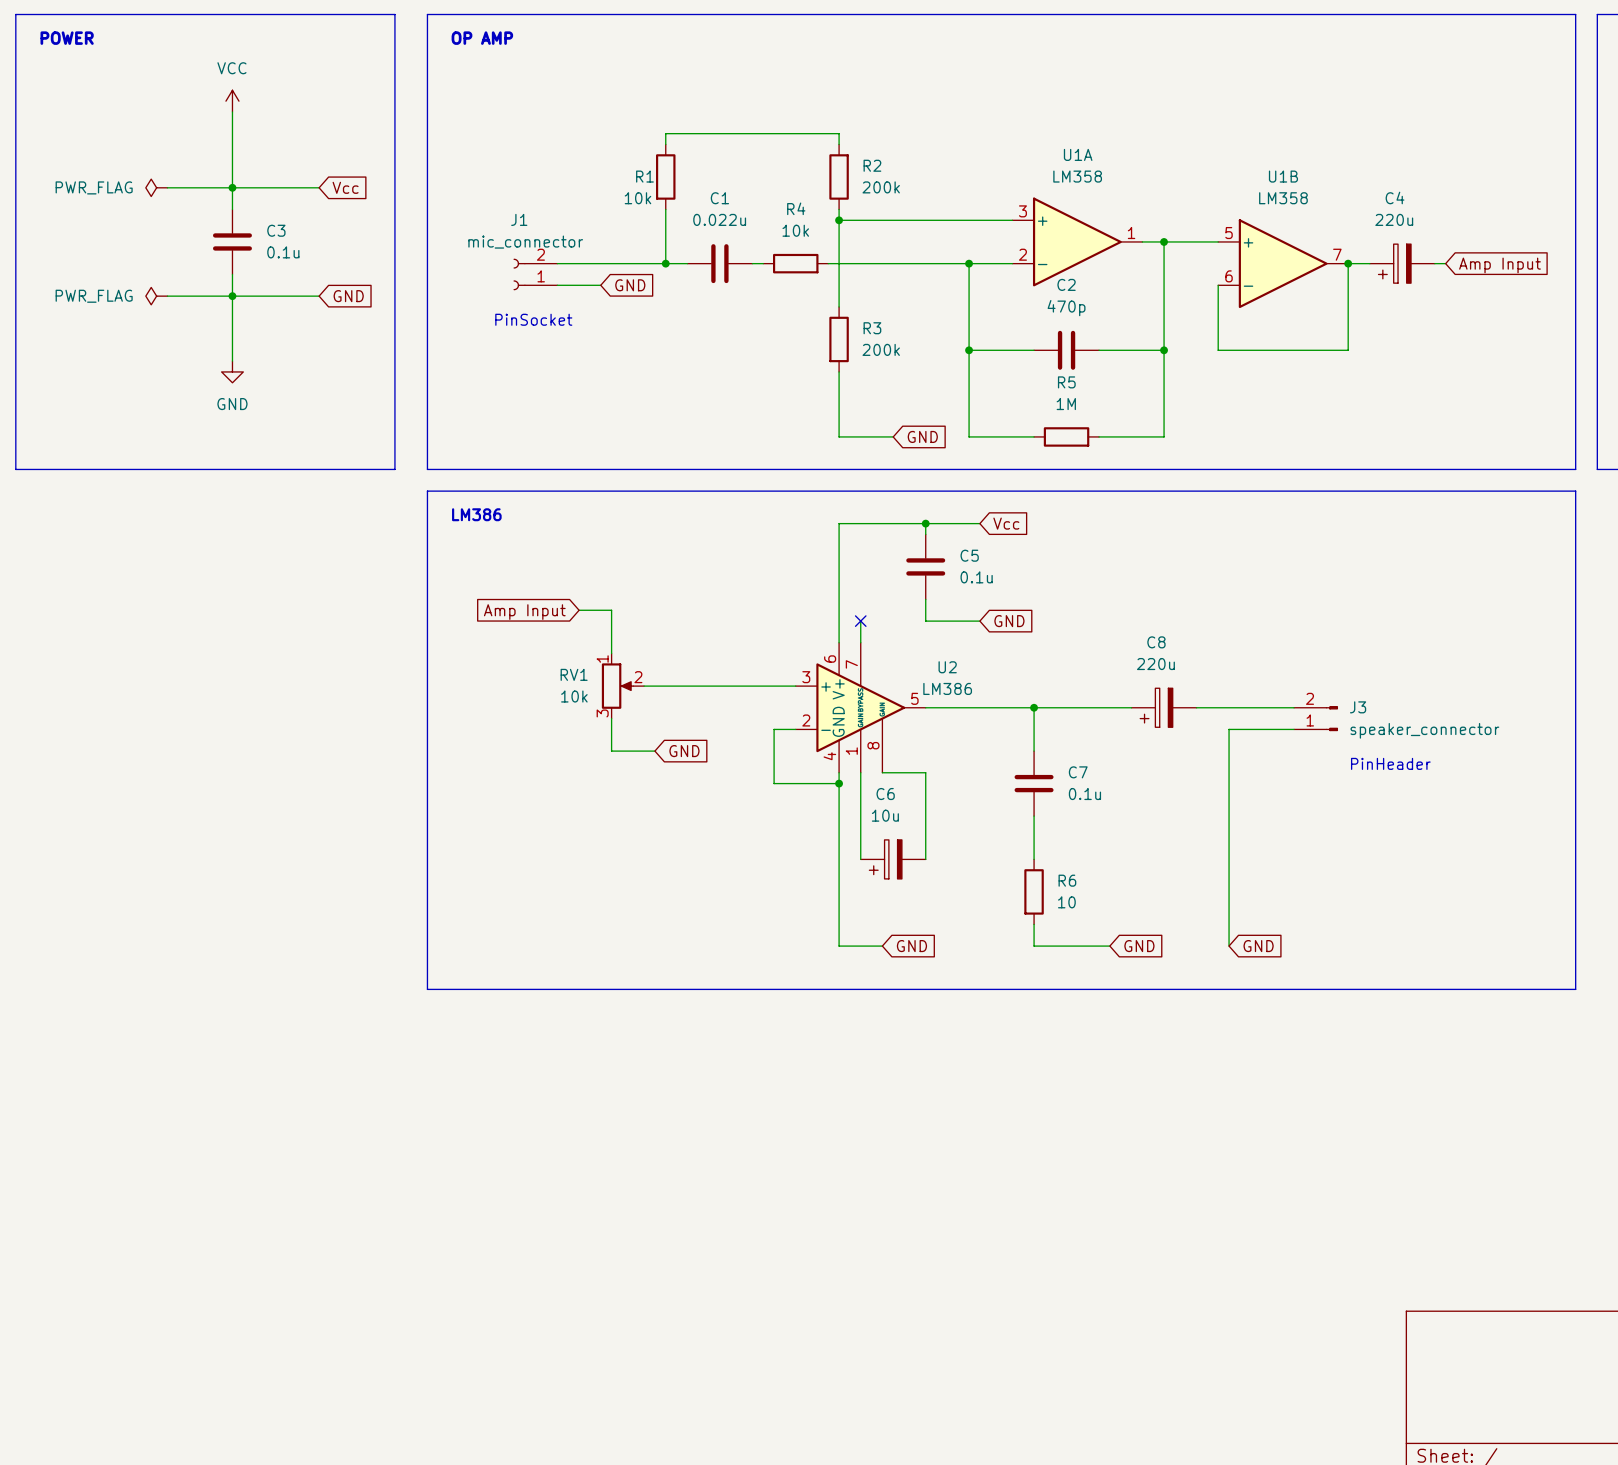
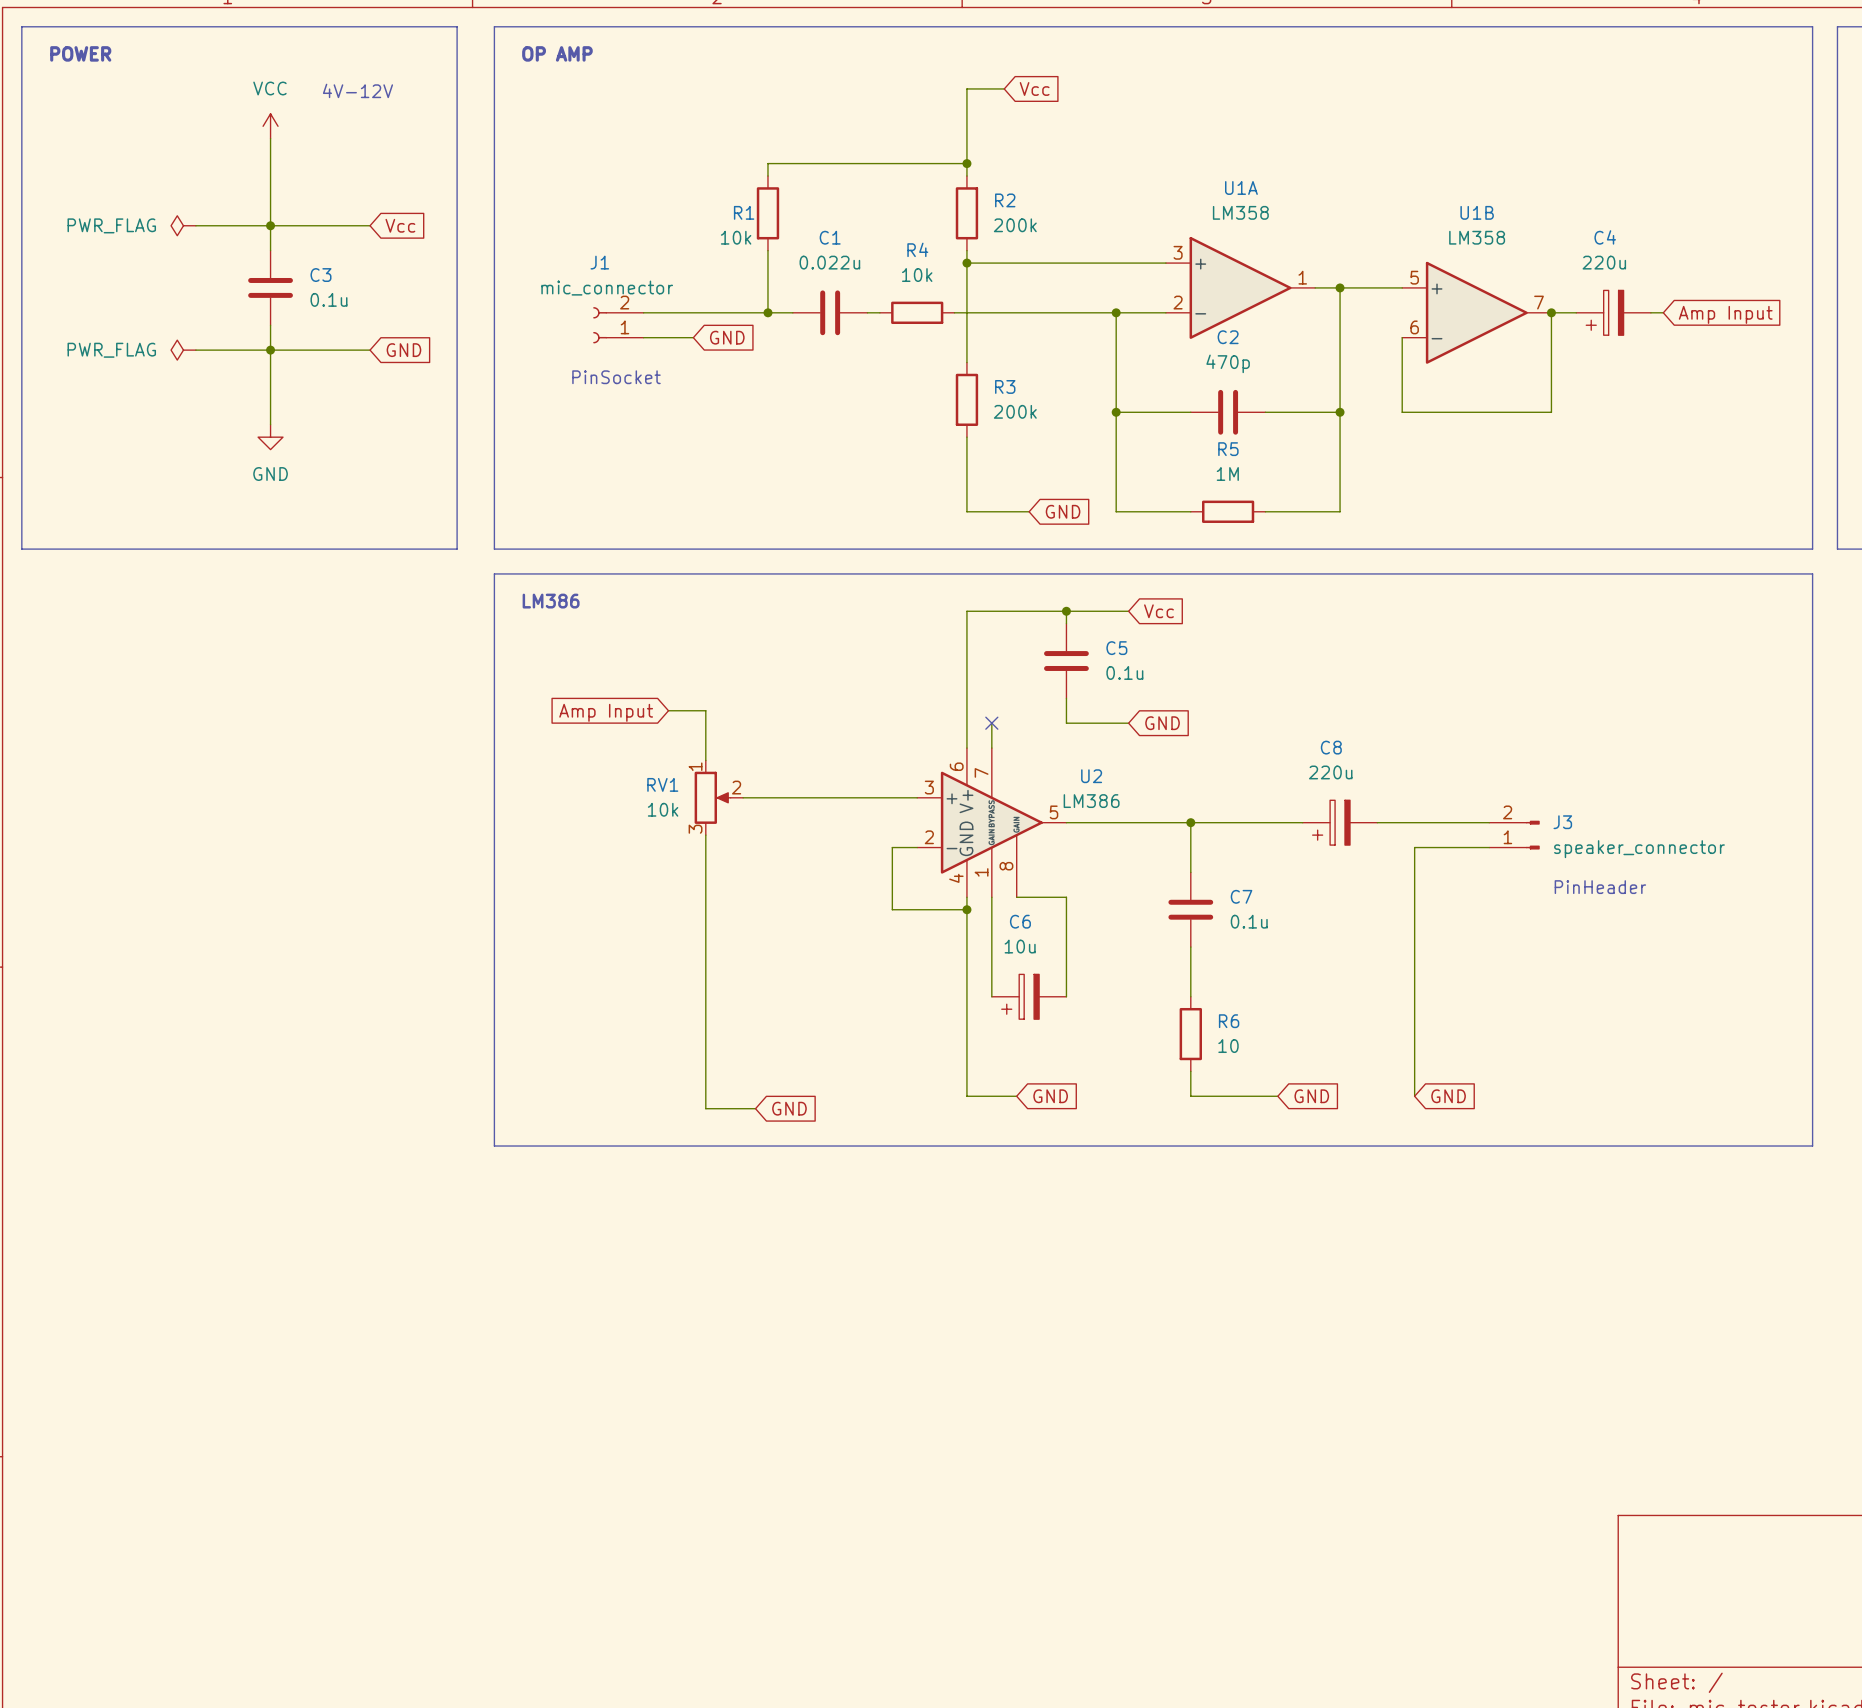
wire: none -> (1004, 88) (966, 88) (966, 163)
global label: none -> Vcc (1034, 88)
text: none -> 4V-12V (357, 90)
junction: none -> (966, 163)
wire: (611, 751) (654, 751) -> (705, 872) (705, 1108) (755, 1108)
global label position: GND (684, 751) -> GND (789, 1108)

